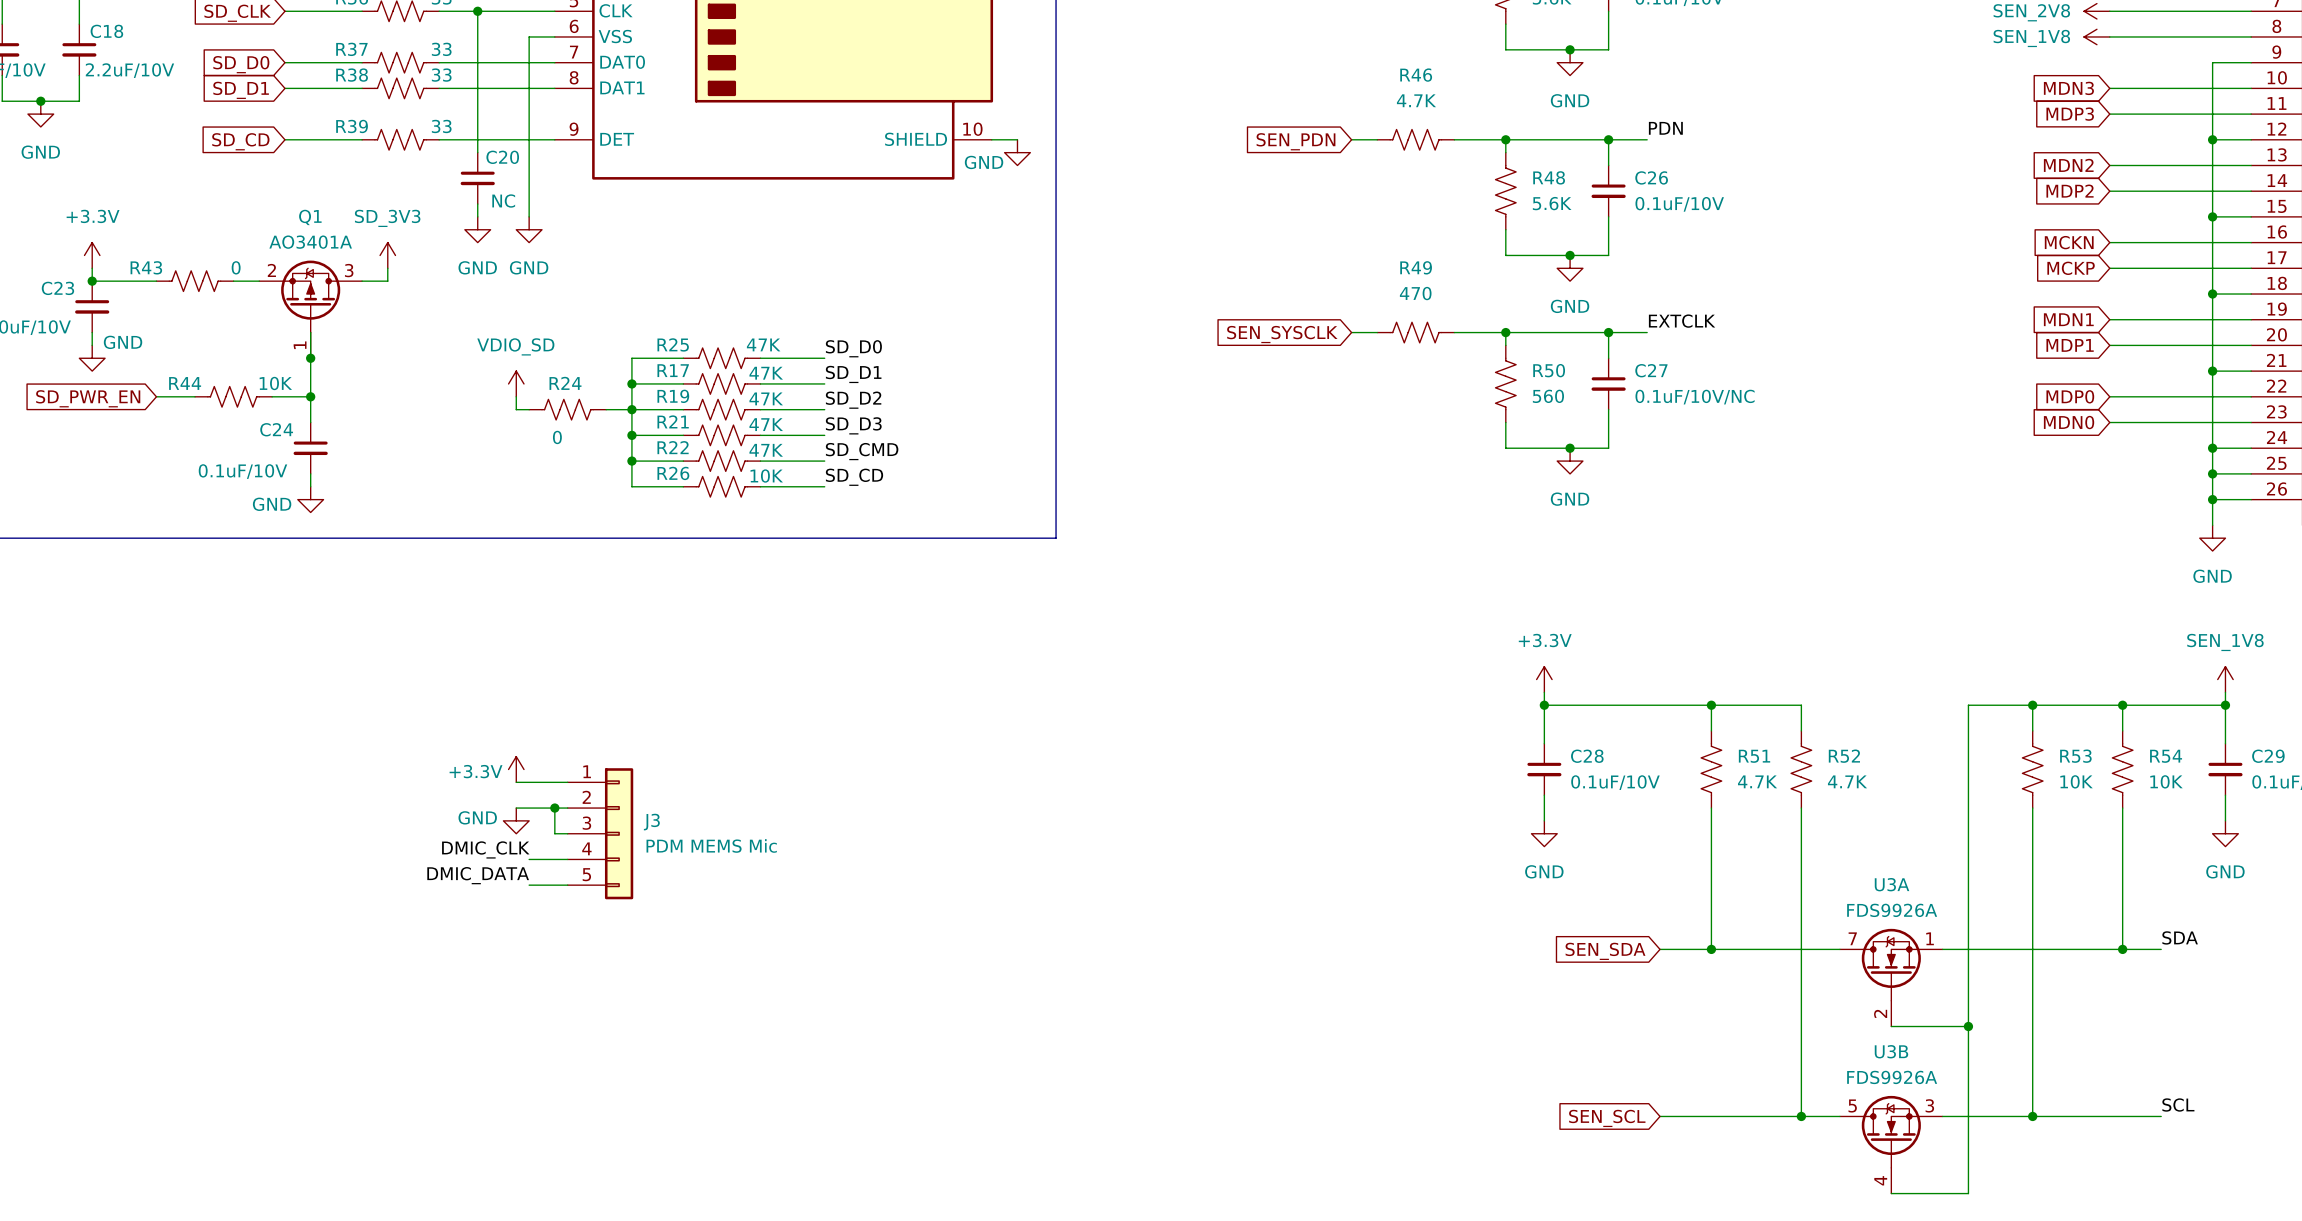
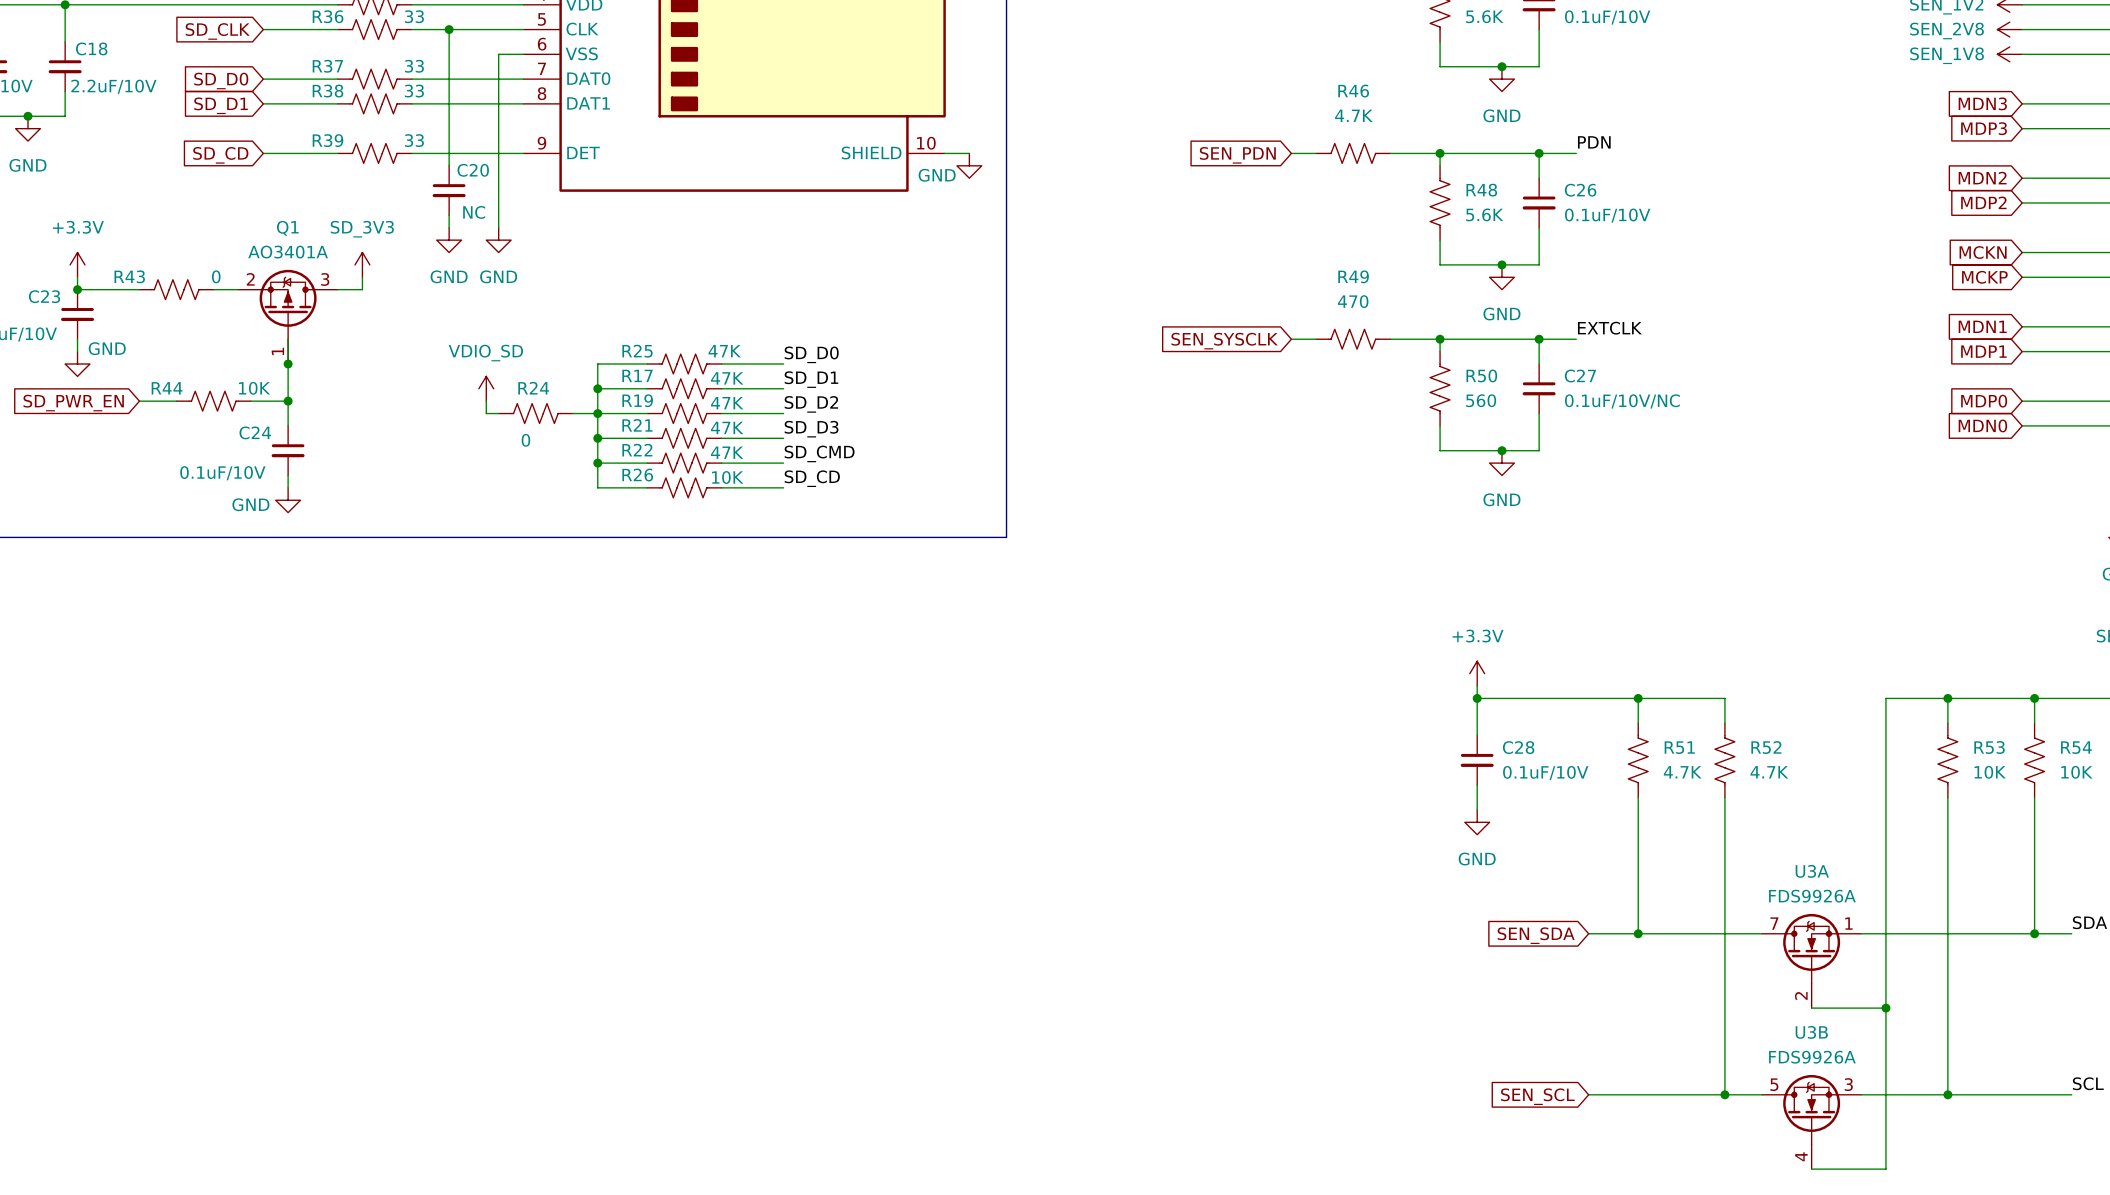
power symbol: +3.3V (516, 769) -> none
wire: (516, 782) (567, 782) -> none
wire: (516, 808) (567, 808) -> none
wire: (554, 808) (554, 833) (567, 833) -> none
junction: (554, 808) -> none
power symbol: GND (516, 820) -> none
J3: PDM MEMS Mic (600, 833) -> none
label: DMIC_CLK (485, 849) -> none
wire: (529, 859) (567, 859) -> none
label: DMIC_DATA (478, 875) -> none
wire: (529, 885) (567, 885) -> none

